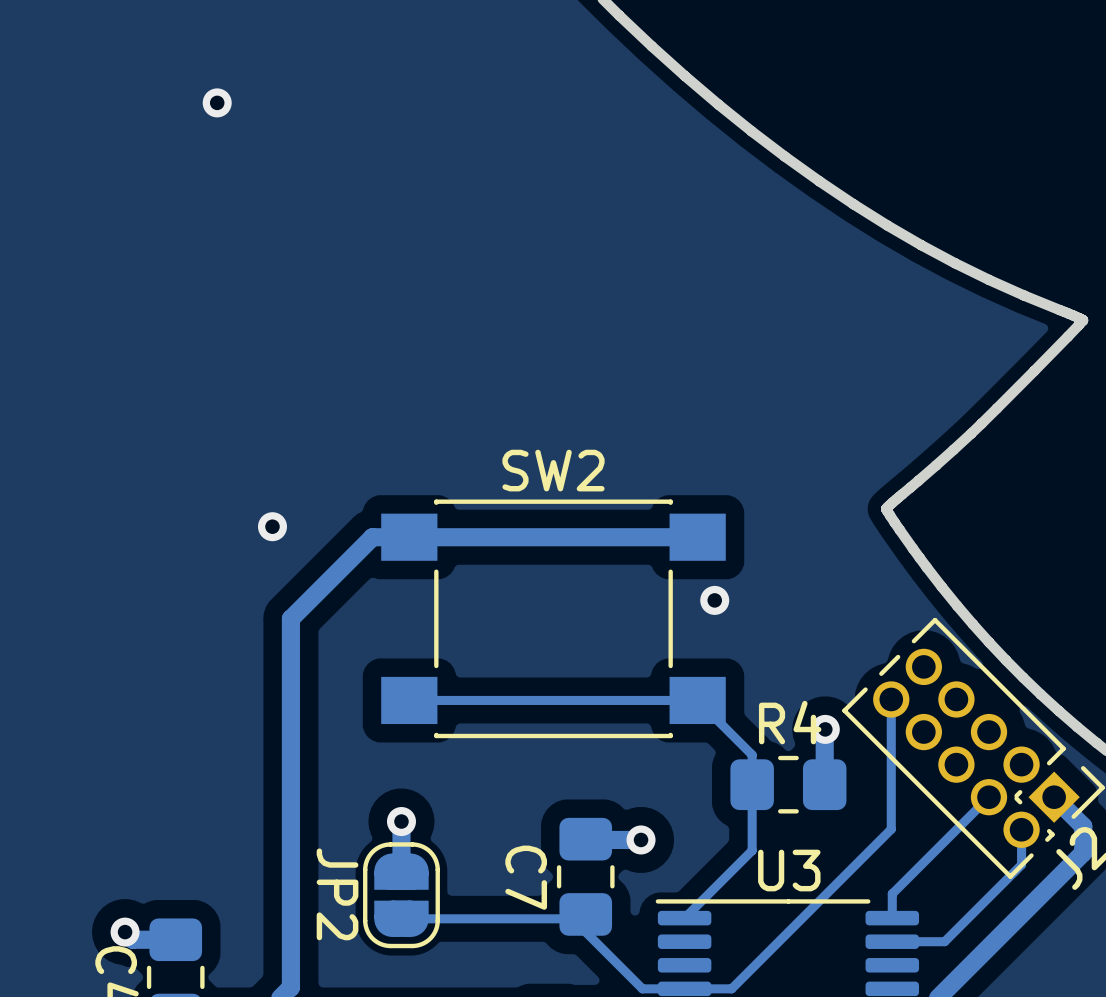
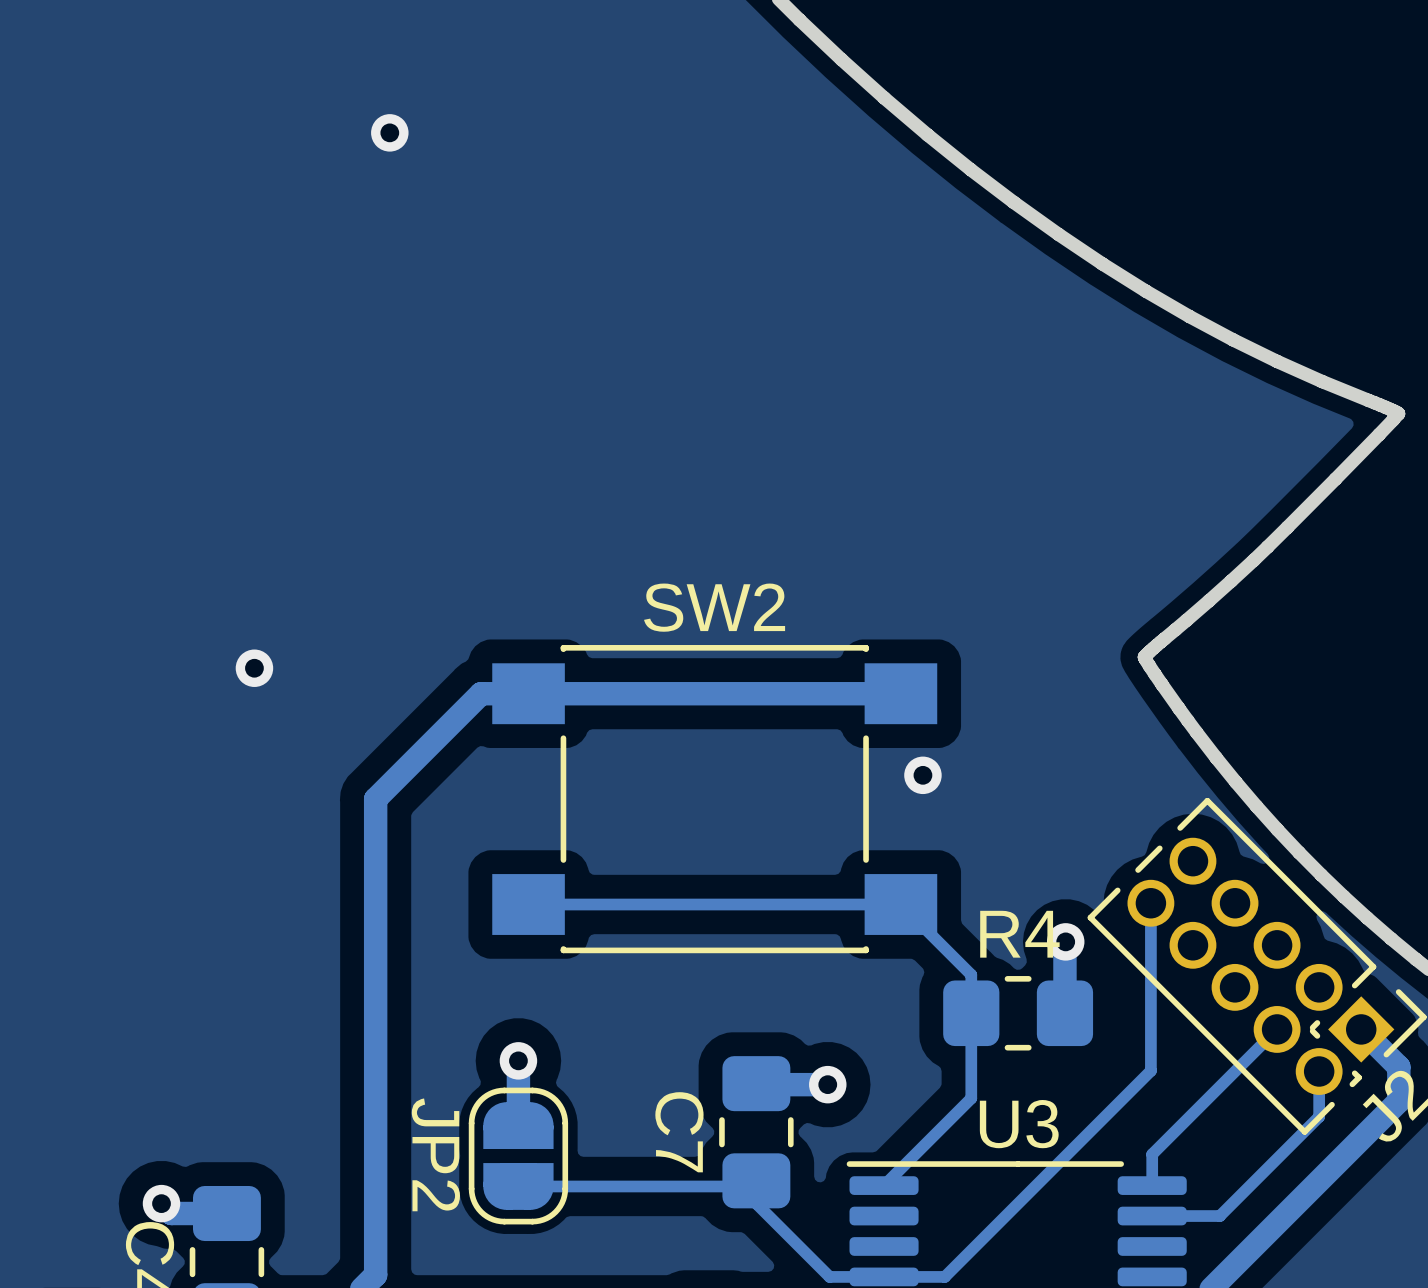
via position: (217, 102) -> (389, 132)
via position: (272, 526) -> (254, 668)

